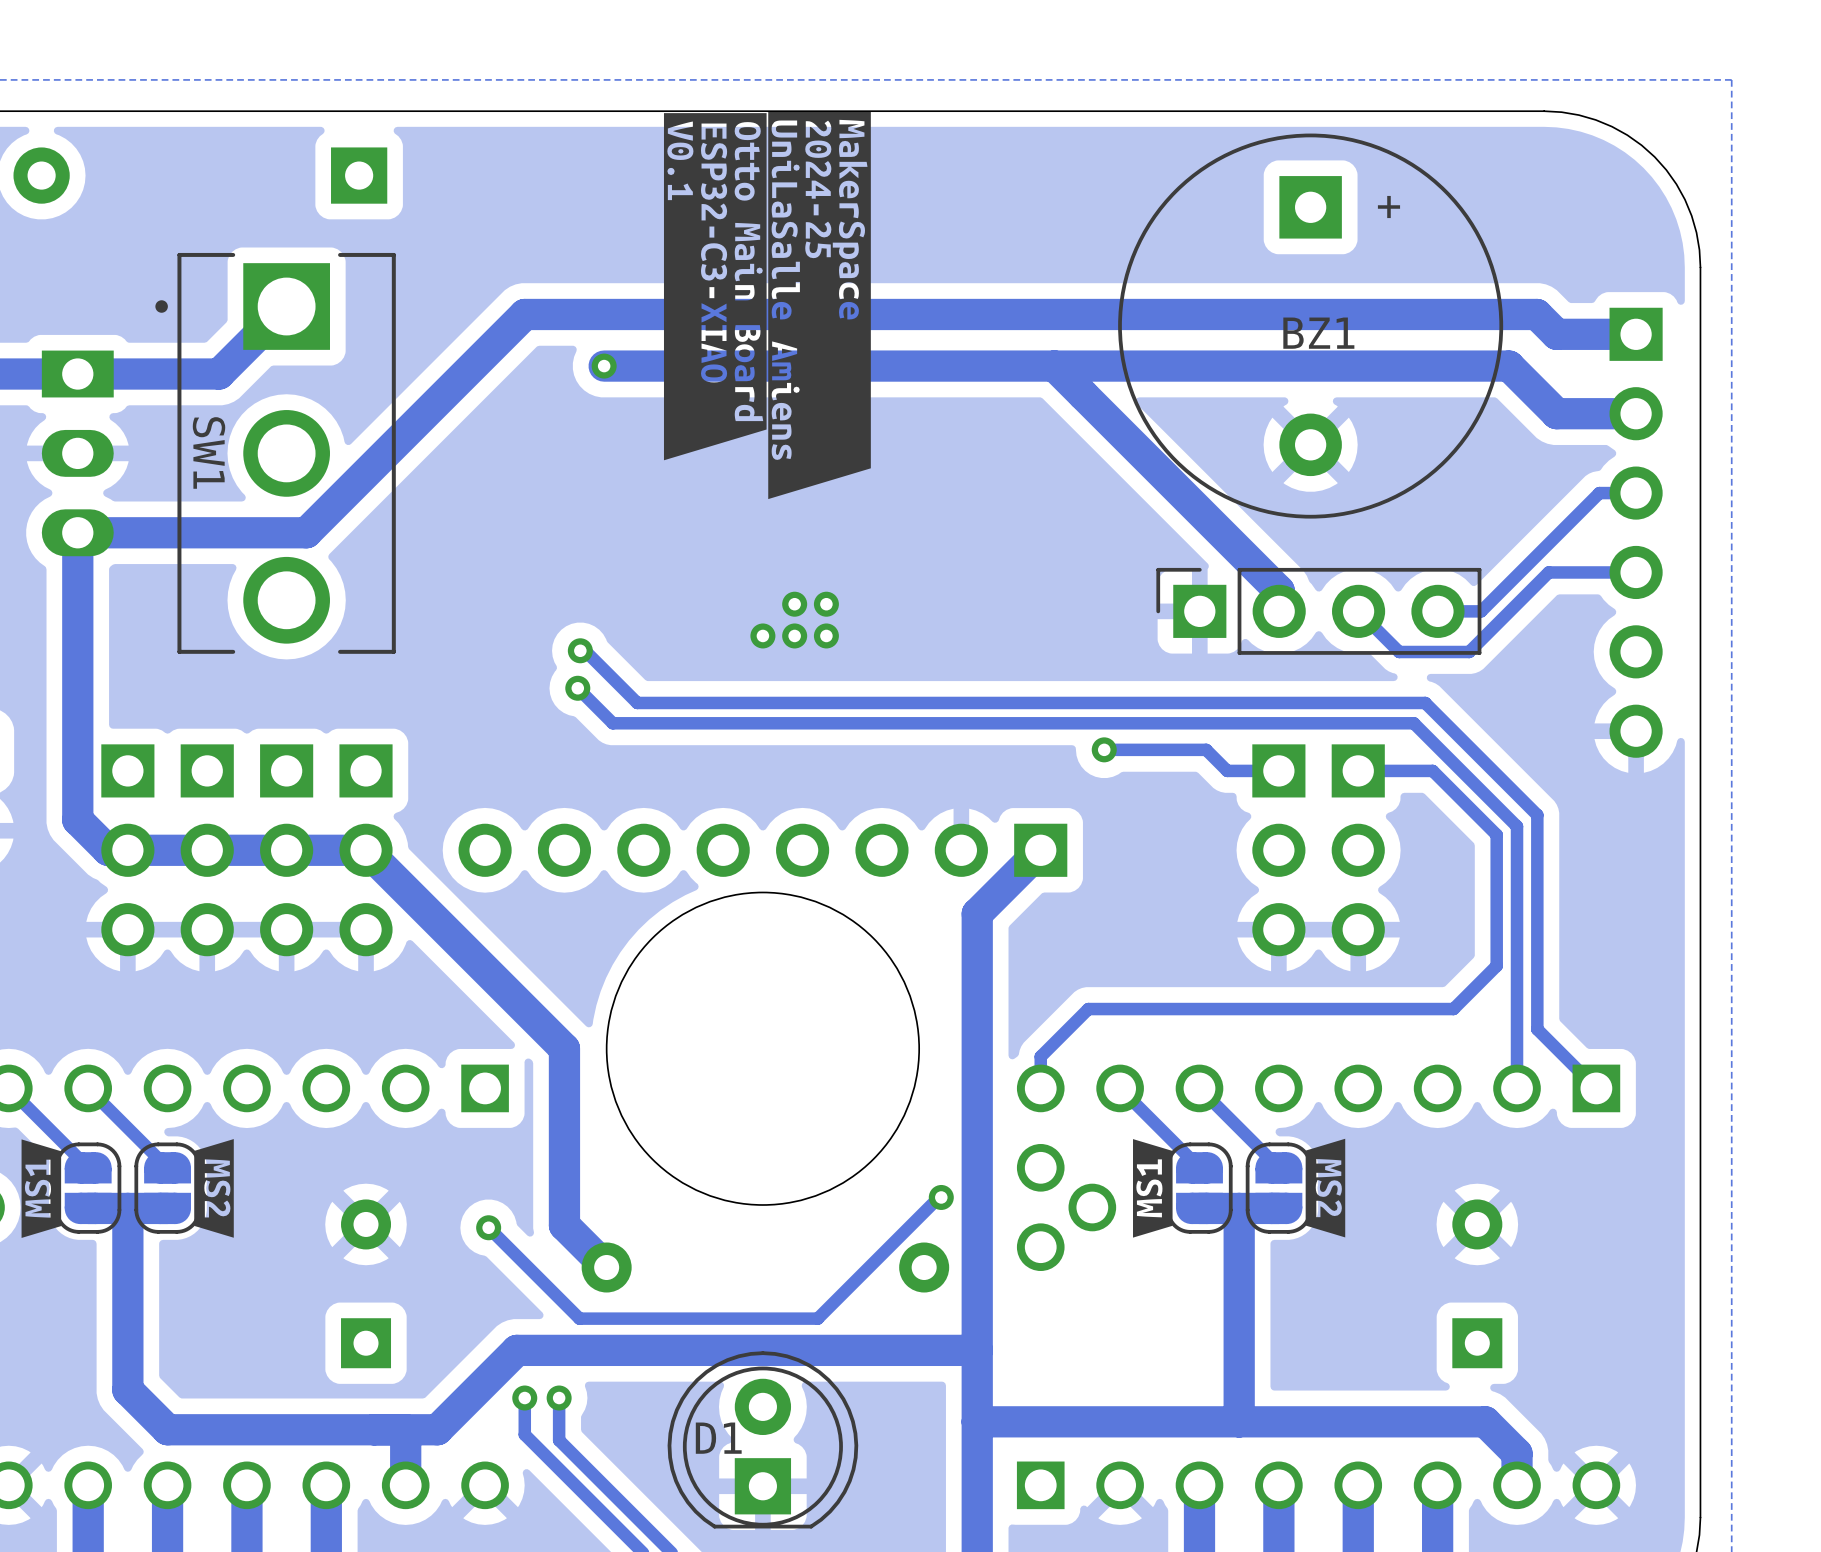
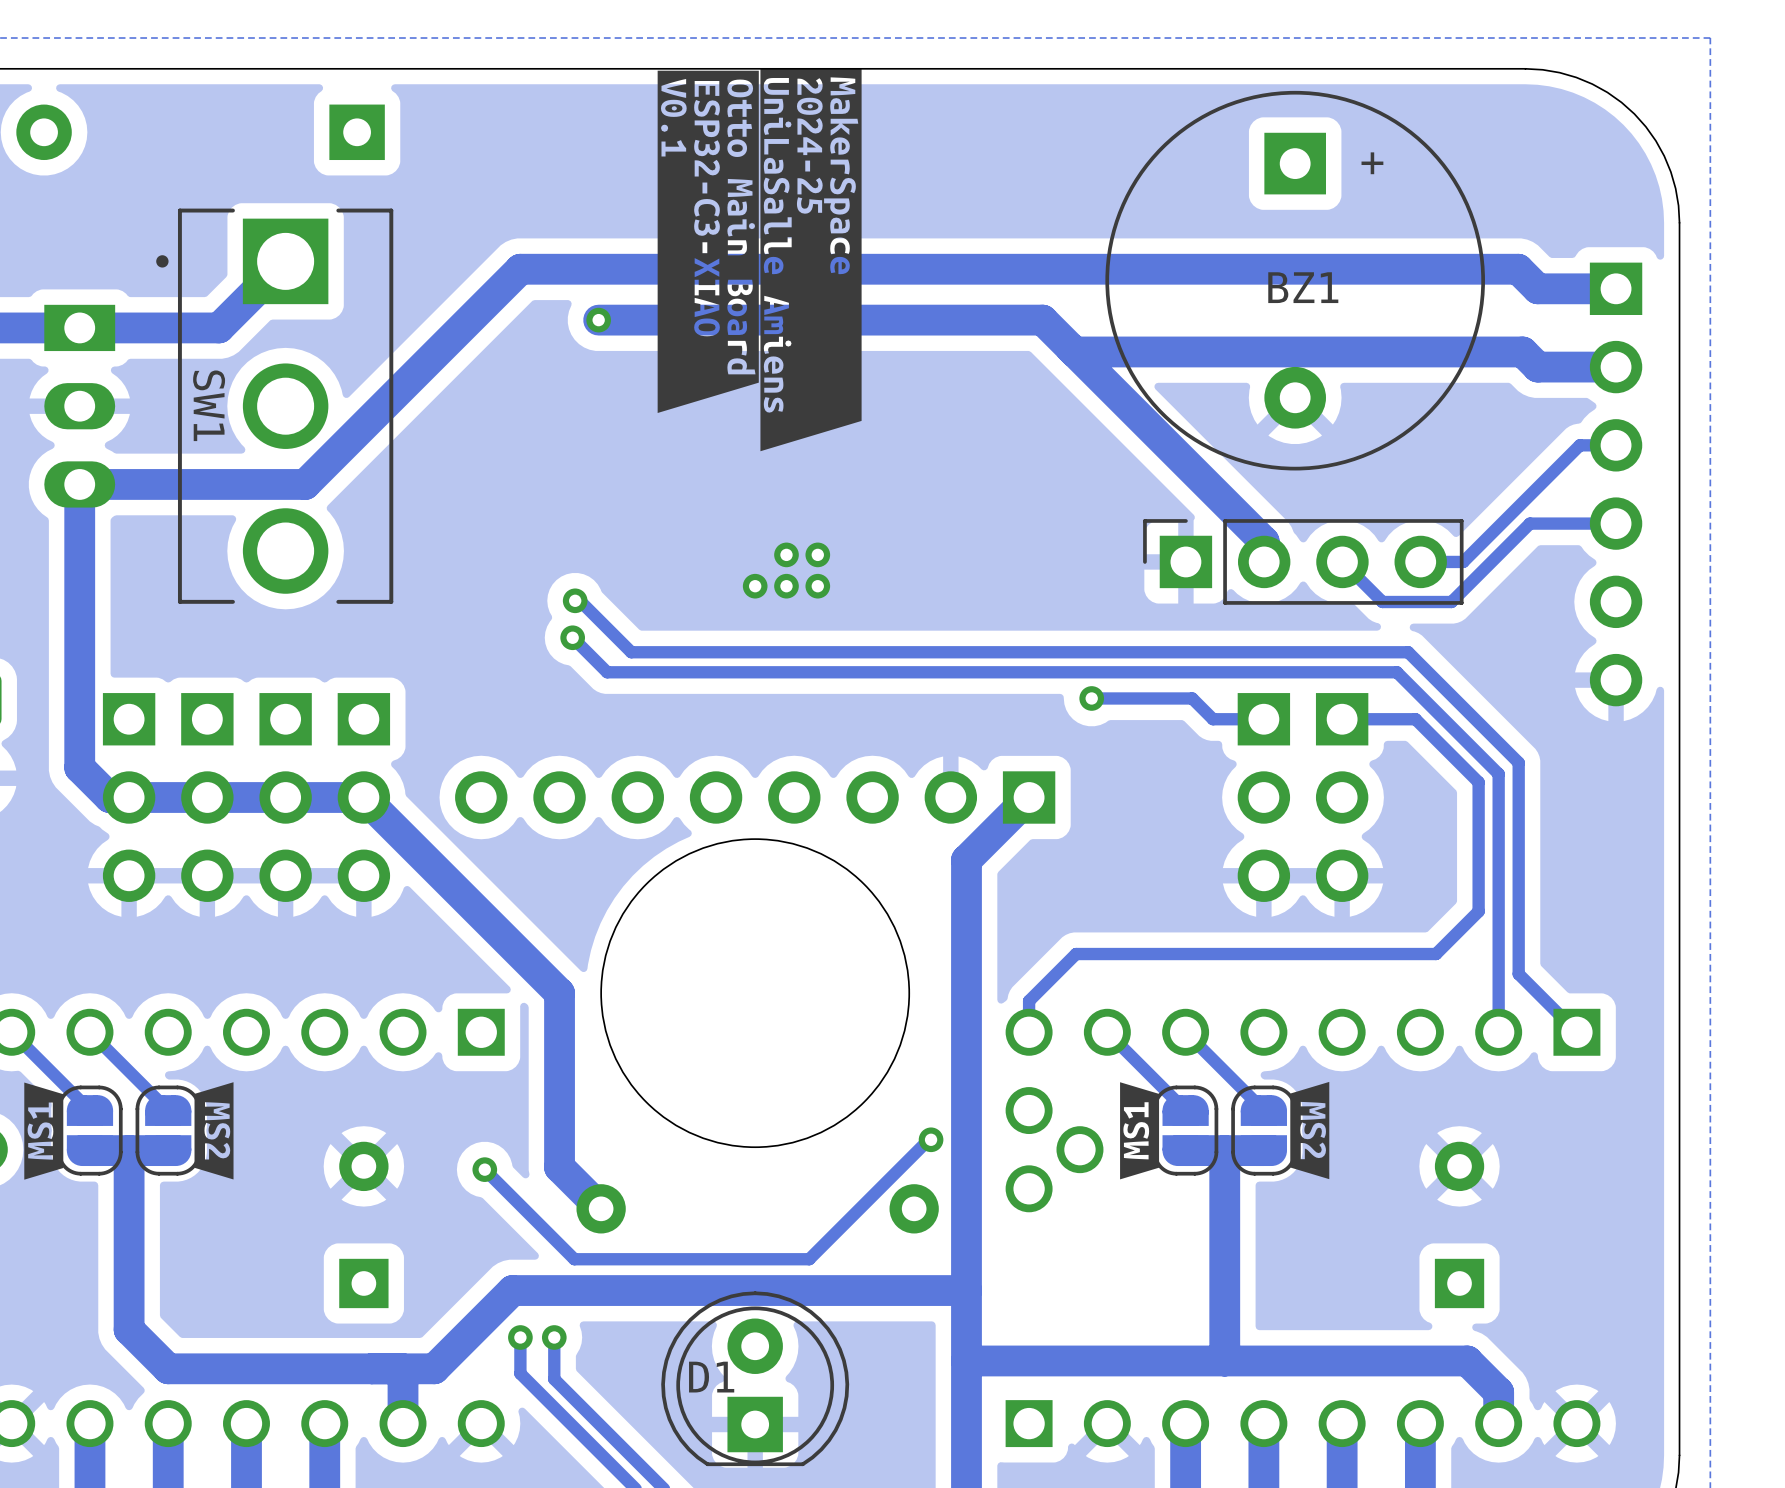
track: (1054, 366) (1509, 366) (1541, 398) -> (1074, 351) (1522, 351)

